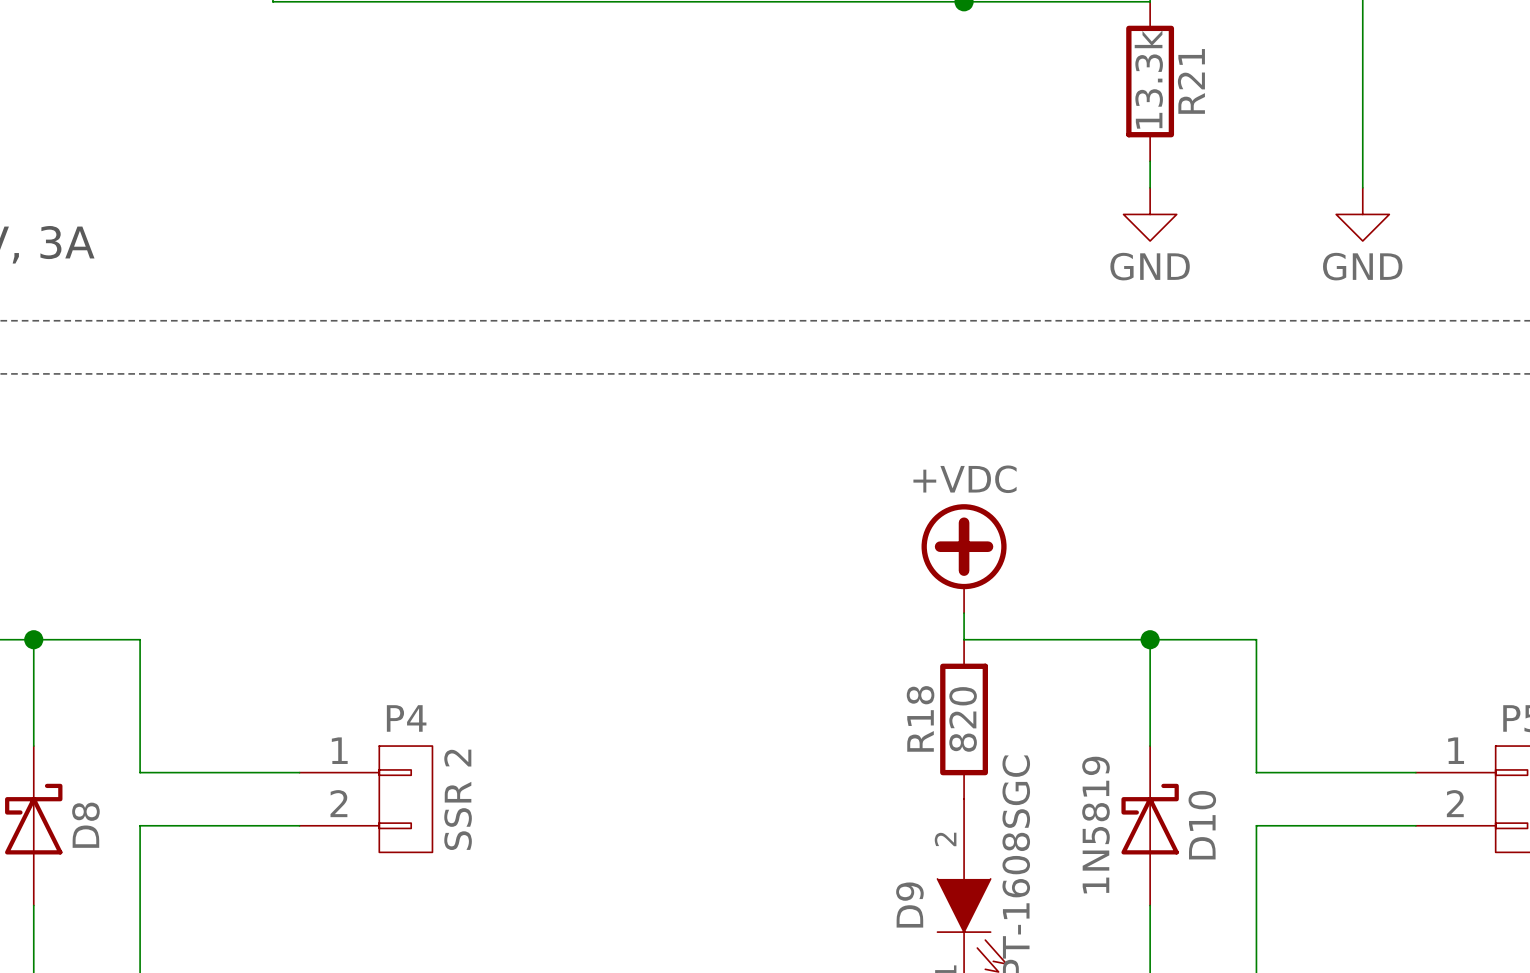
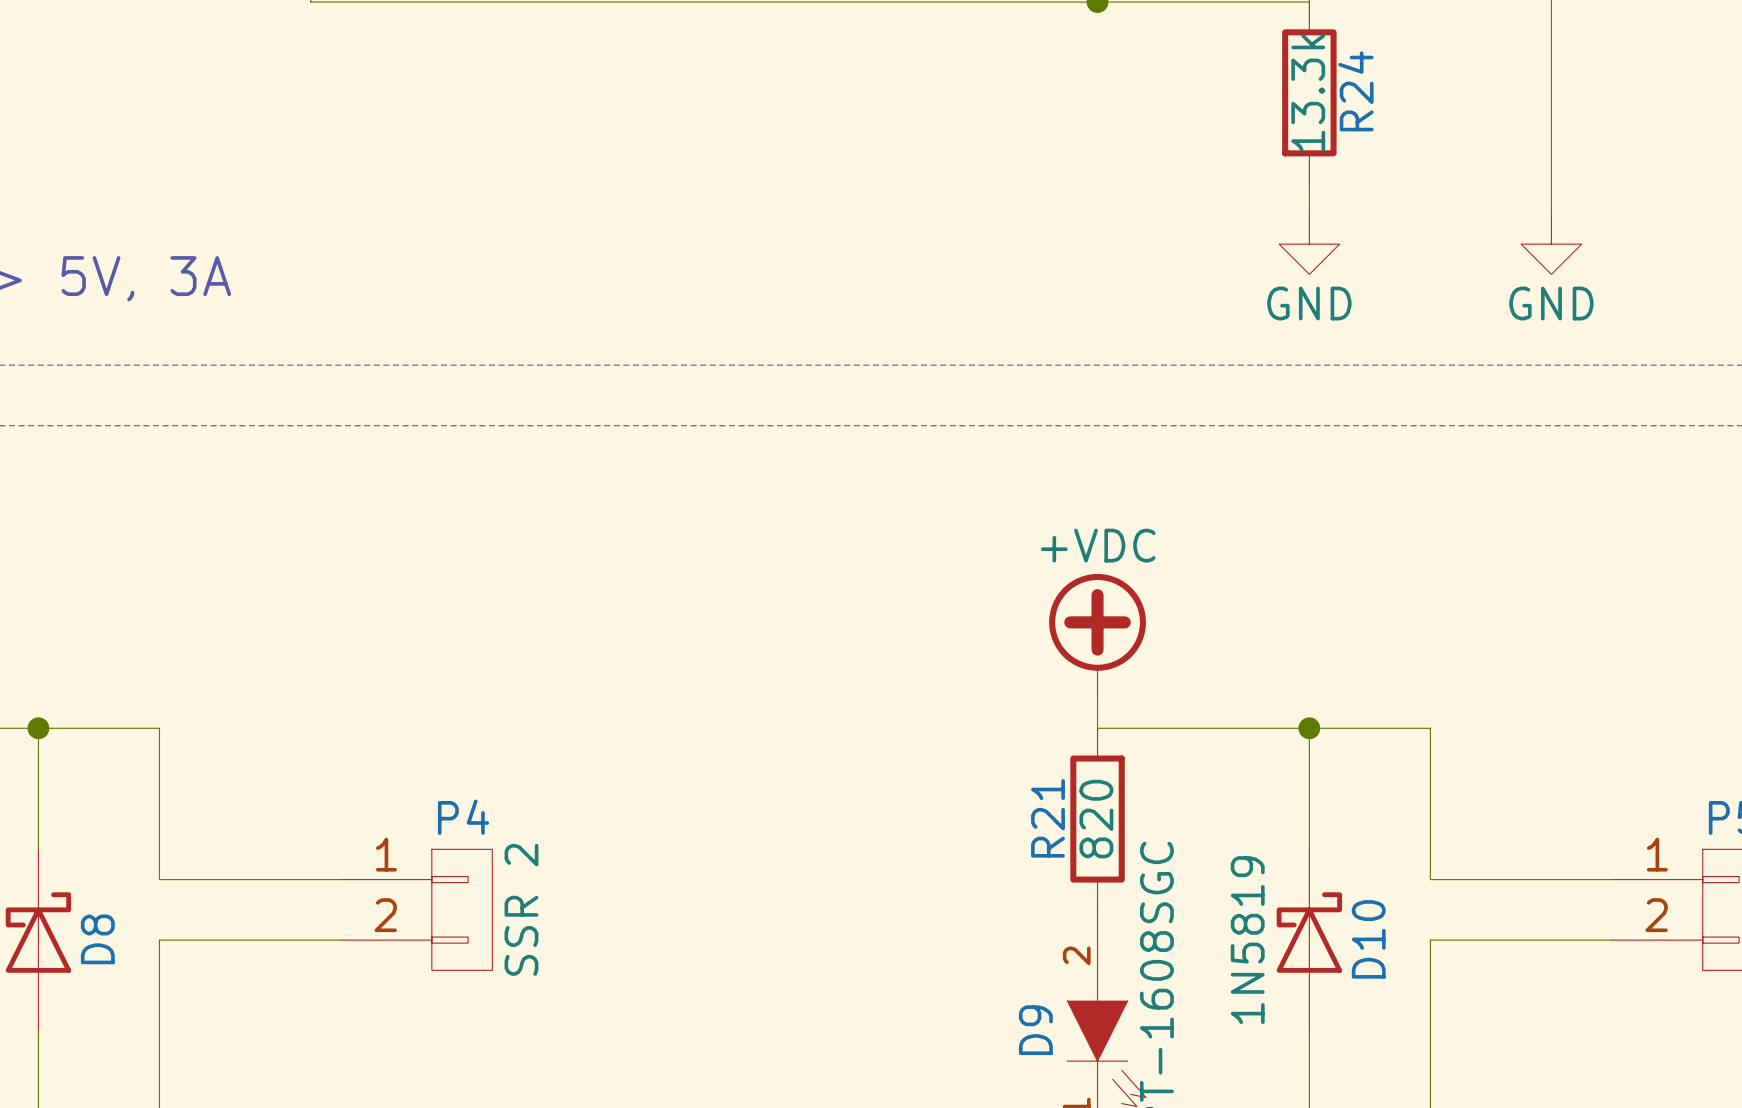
R21 name: R21 (1191, 81) -> R24 (1355, 91)
R18 name: R18 (920, 718) -> R21 (1047, 818)

